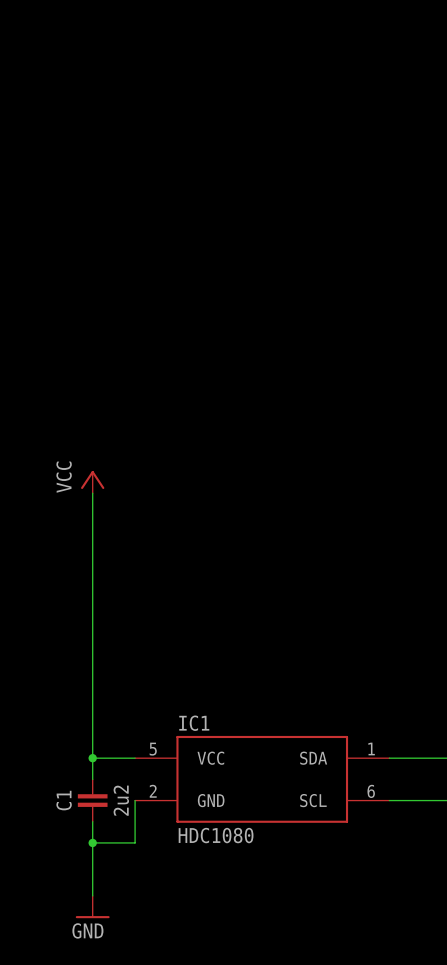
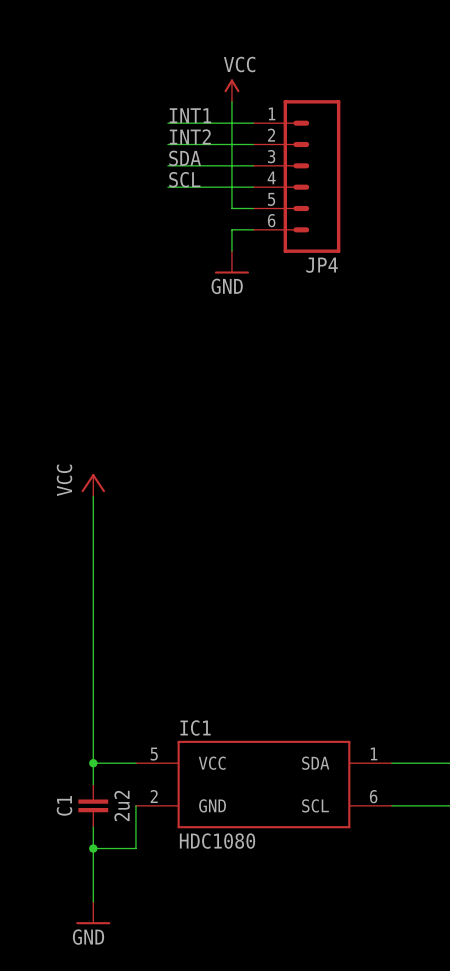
power symbol: none -> VCC (231, 90)
wire: none -> (231, 101) (231, 208) (253, 208)
label: none -> INT1 (190, 115)
wire: none -> (167, 123) (253, 123)
label: none -> INT2 (190, 136)
wire: none -> (167, 144) (253, 144)
label: none -> SDA (185, 158)
wire: none -> (167, 165) (253, 165)
JP4: none -> (296, 176)
label: none -> SCL (184, 179)
wire: none -> (167, 187) (253, 187)
wire: none -> (253, 229) (231, 229) (231, 251)
power symbol: none -> GND (231, 262)

